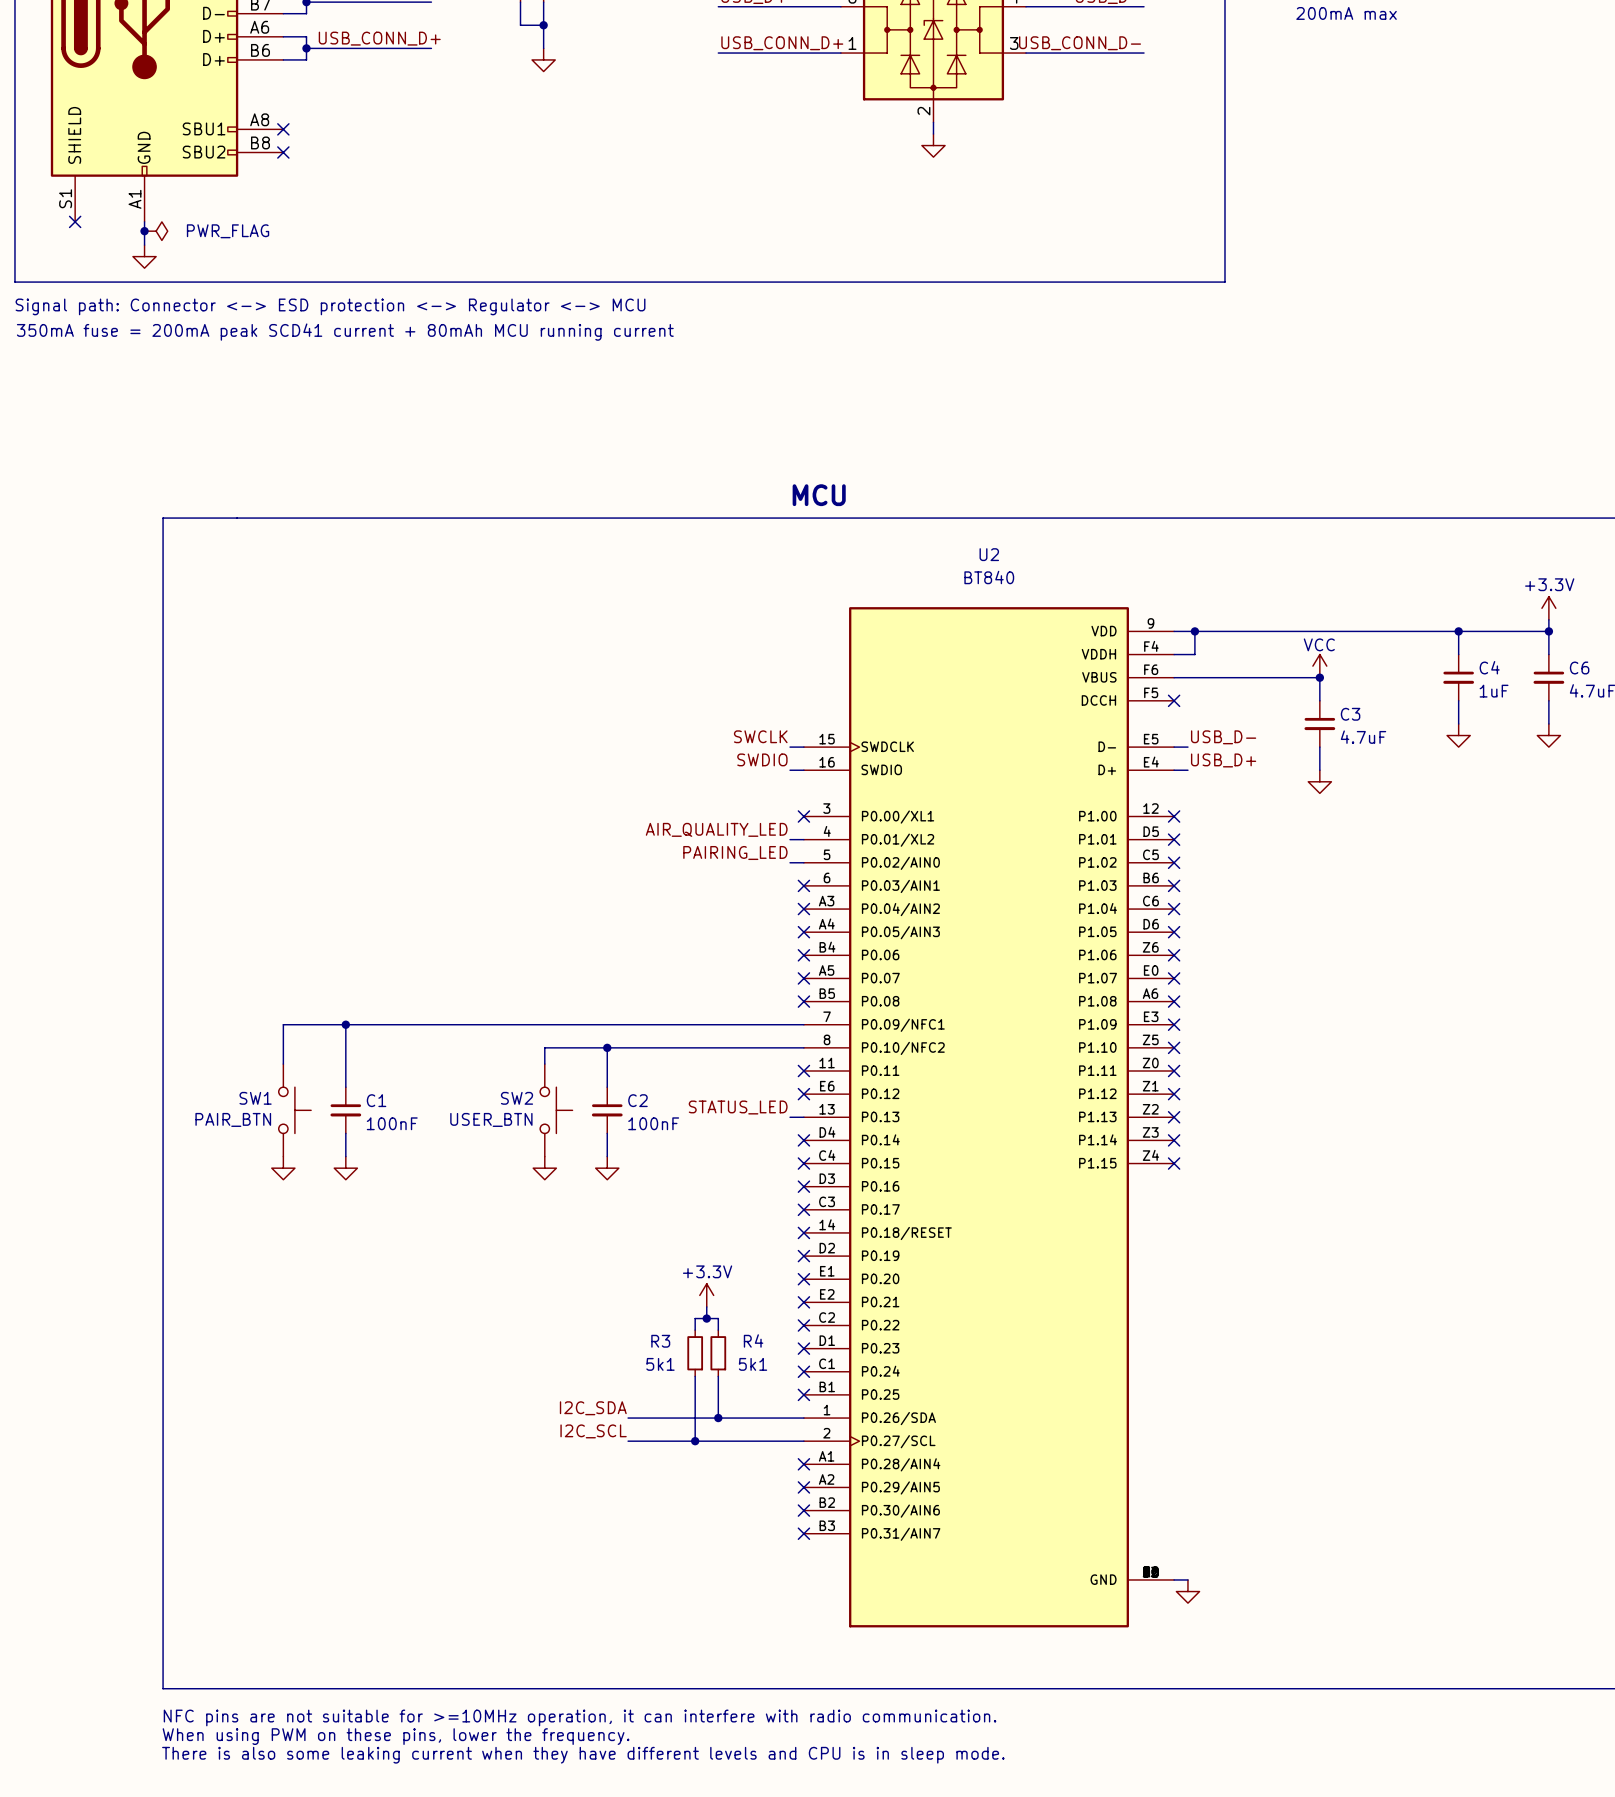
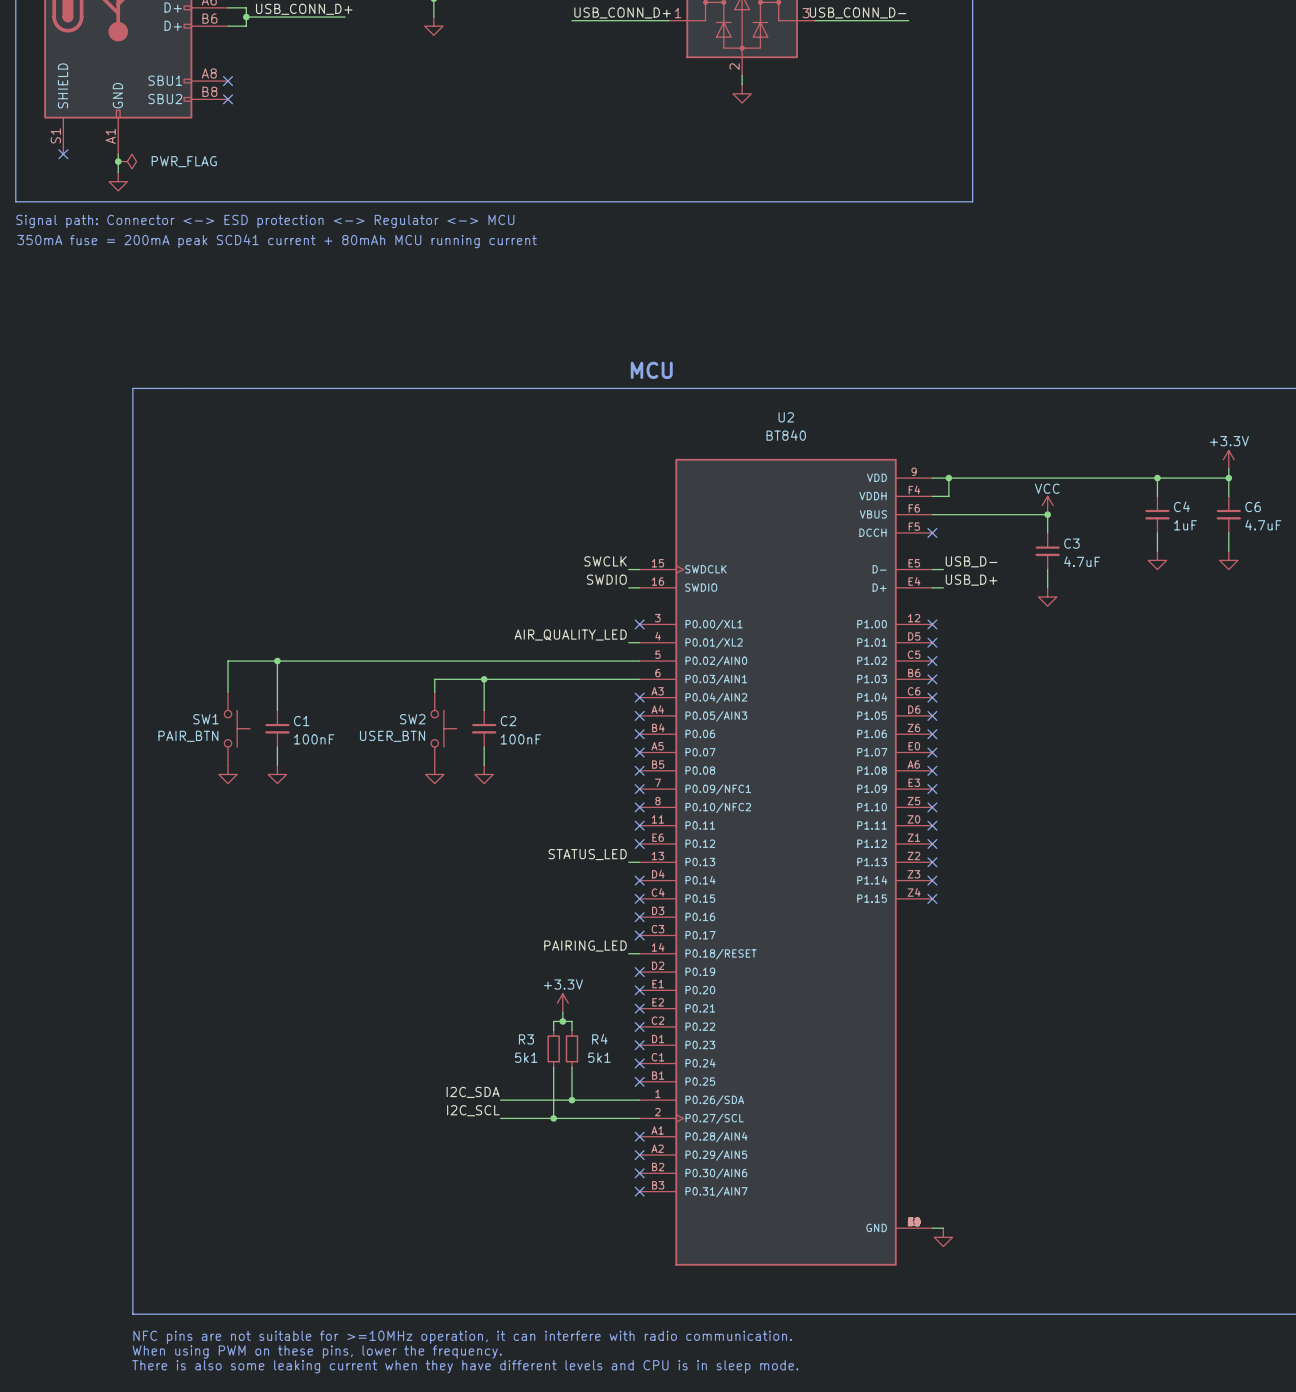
label: PAIRING_LED (735, 853) -> none
junction: none -> (277, 661)
wire: none -> (628, 661) (228, 661) (228, 692)
junction: none -> (484, 679)
no-connect mark: (803, 885) -> none
power symbol: none -> (228, 774)
power symbol: none -> (277, 774)
power symbol: none -> (434, 774)
power symbol: none -> (484, 774)
wire: (345, 1024) (345, 1087) -> (277, 661) (277, 710)
junction: (345, 1024) -> none
wire: (803, 1024) (283, 1024) (283, 1064) -> none
no-connect mark: none -> (639, 789)
wire: (607, 1047) (607, 1087) -> (484, 679) (484, 710)
junction: (607, 1047) -> none
wire: (803, 1047) (544, 1047) (544, 1064) -> (639, 679) (434, 679) (434, 692)
no-connect mark: none -> (639, 807)
SW1 position: (294, 1110) -> (237, 728)
C1 position: (345, 1110) -> (277, 728)
SW2 position: (556, 1110) -> (443, 728)
C2 position: (607, 1110) -> (484, 728)
wire: (345, 1133) (345, 1156) -> (277, 747) (277, 765)
wire: (607, 1133) (607, 1156) -> (484, 747) (484, 765)
power symbol: (283, 1168) -> none
power symbol: (345, 1168) -> none
power symbol: (544, 1168) -> none
power symbol: (607, 1168) -> none
label: none -> PAIRING_LED (585, 946)
wire: none -> (628, 953) (639, 953)
no-connect mark: (803, 1232) -> none

